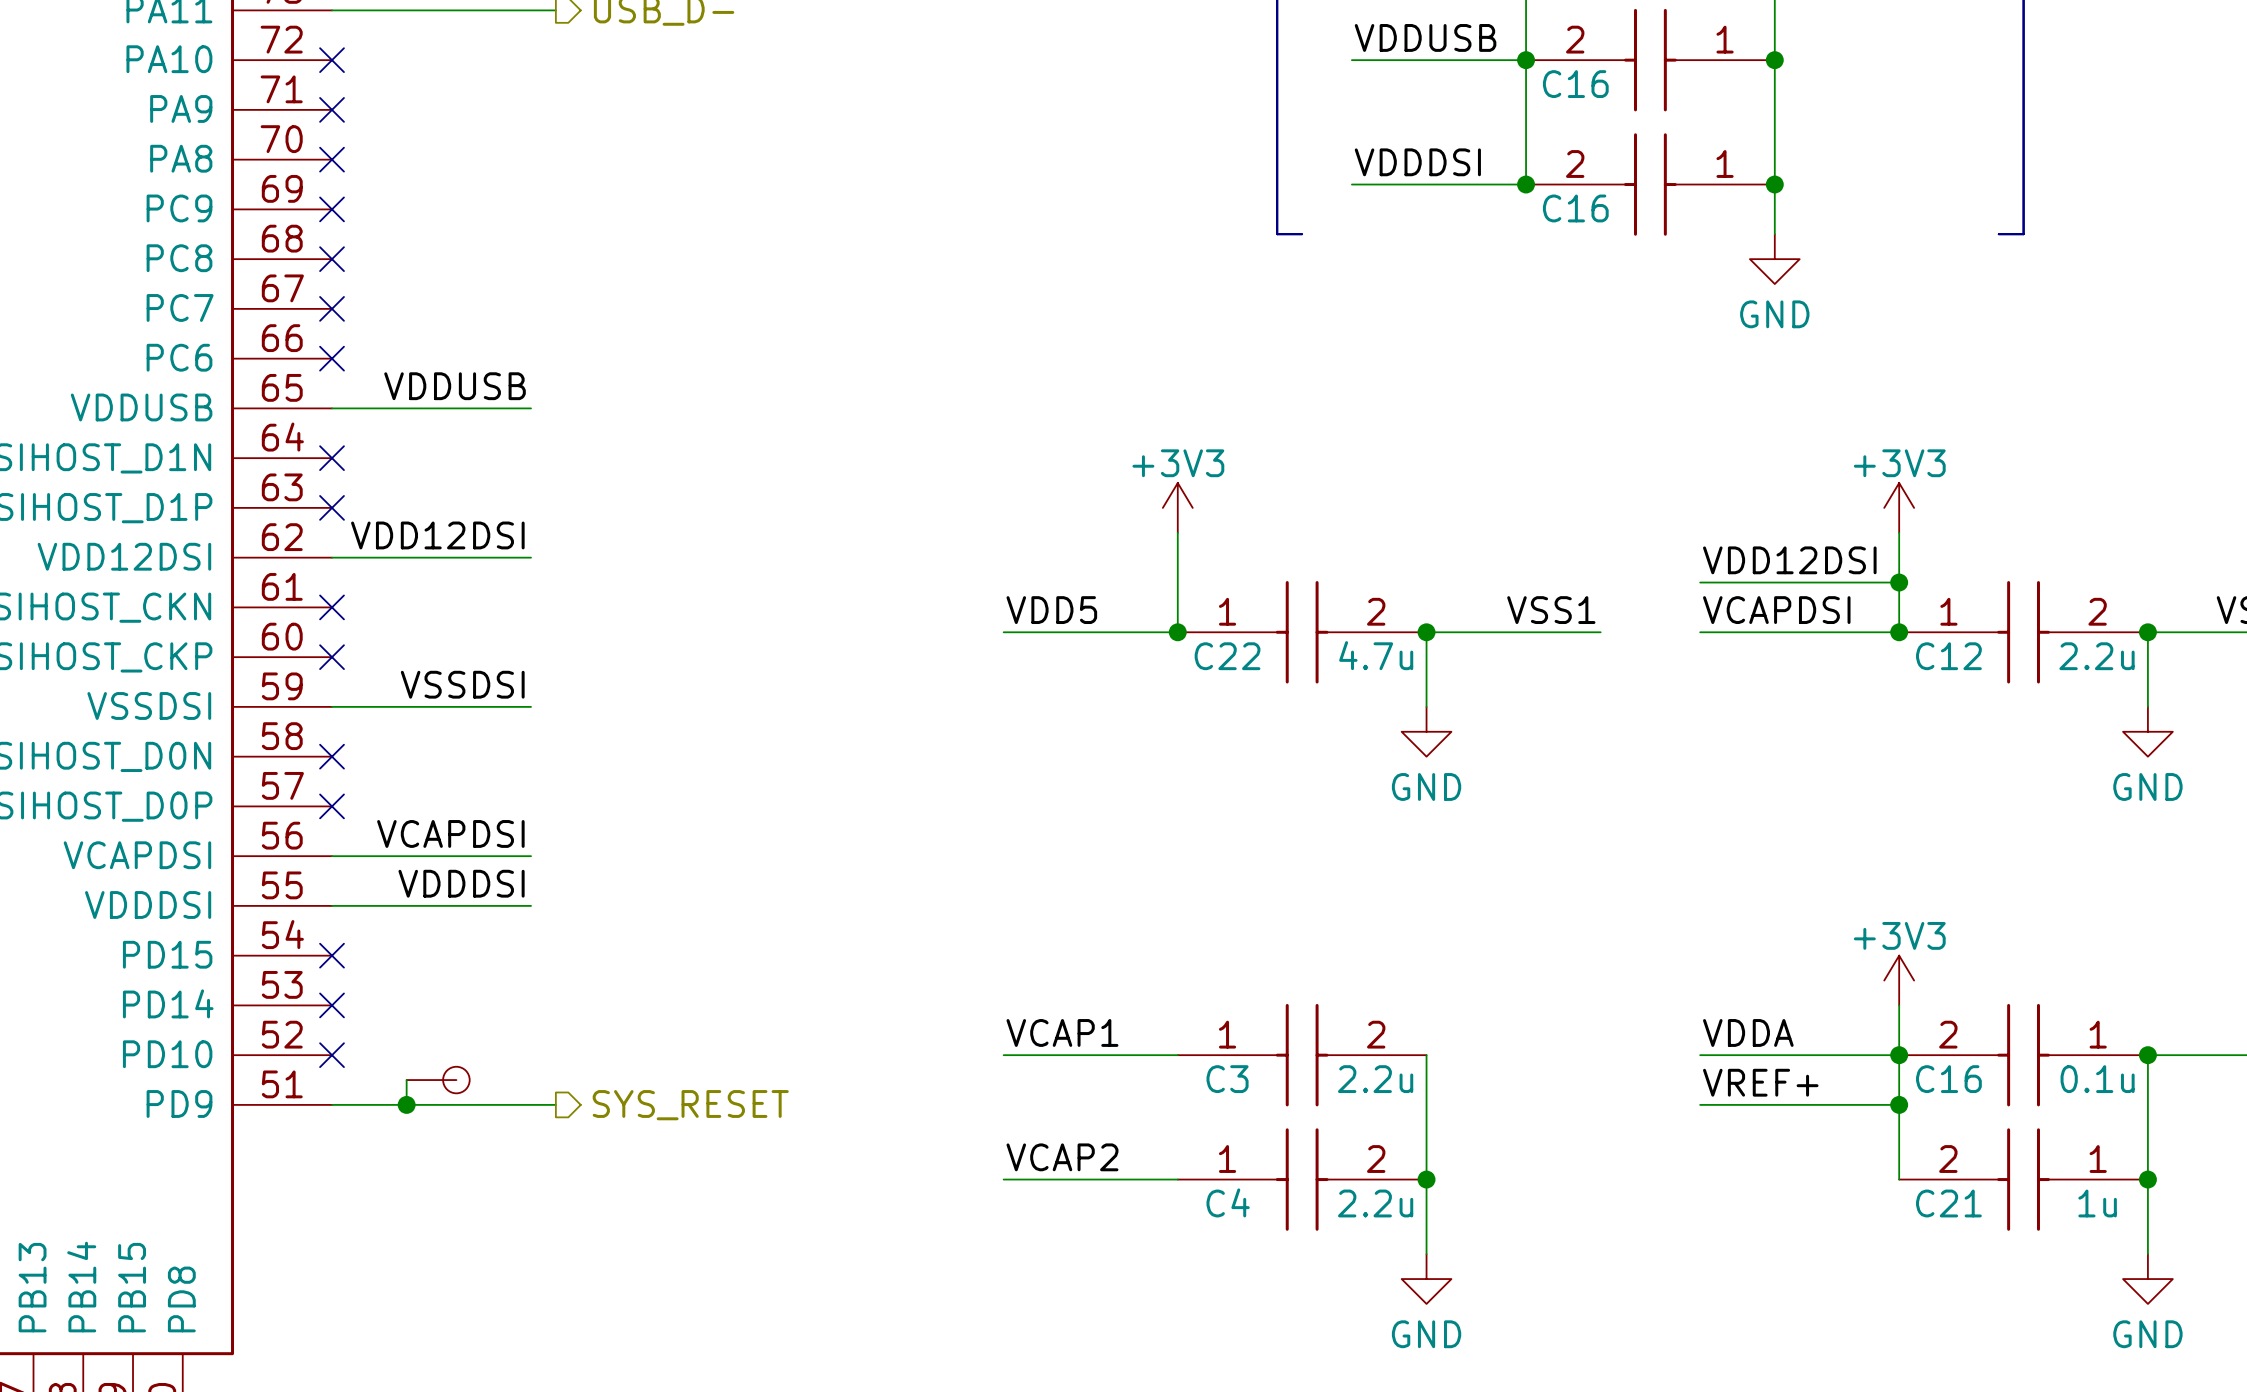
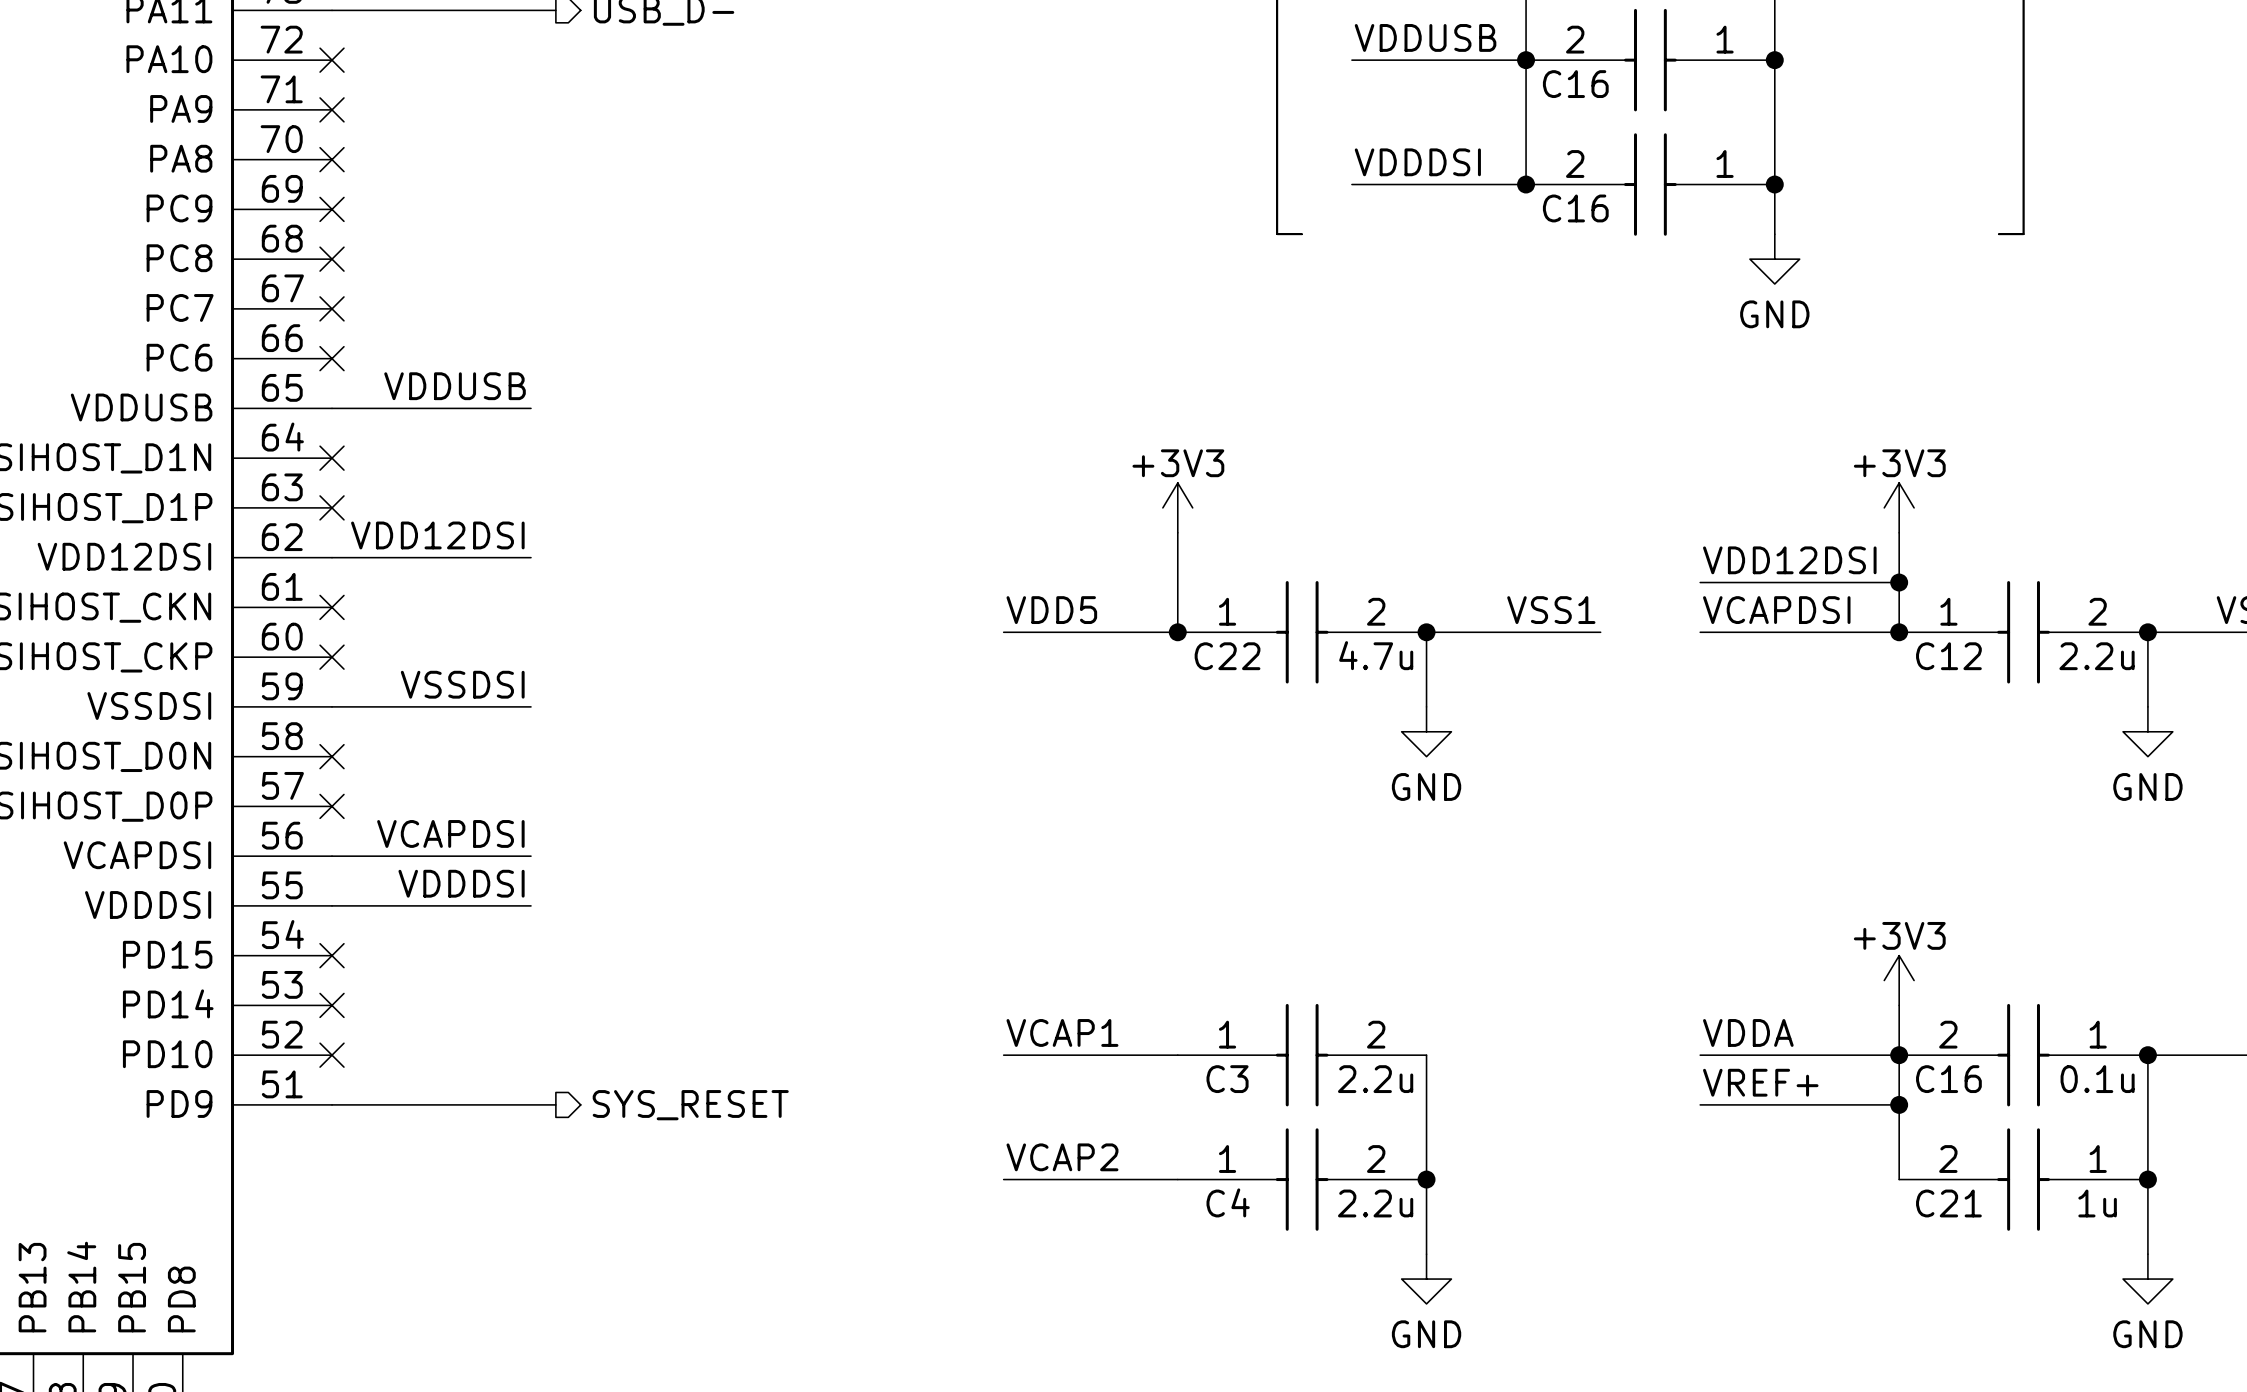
wire: (406, 1080) (406, 1104) -> none
part: (438, 1080) -> none
junction: (406, 1104) -> none

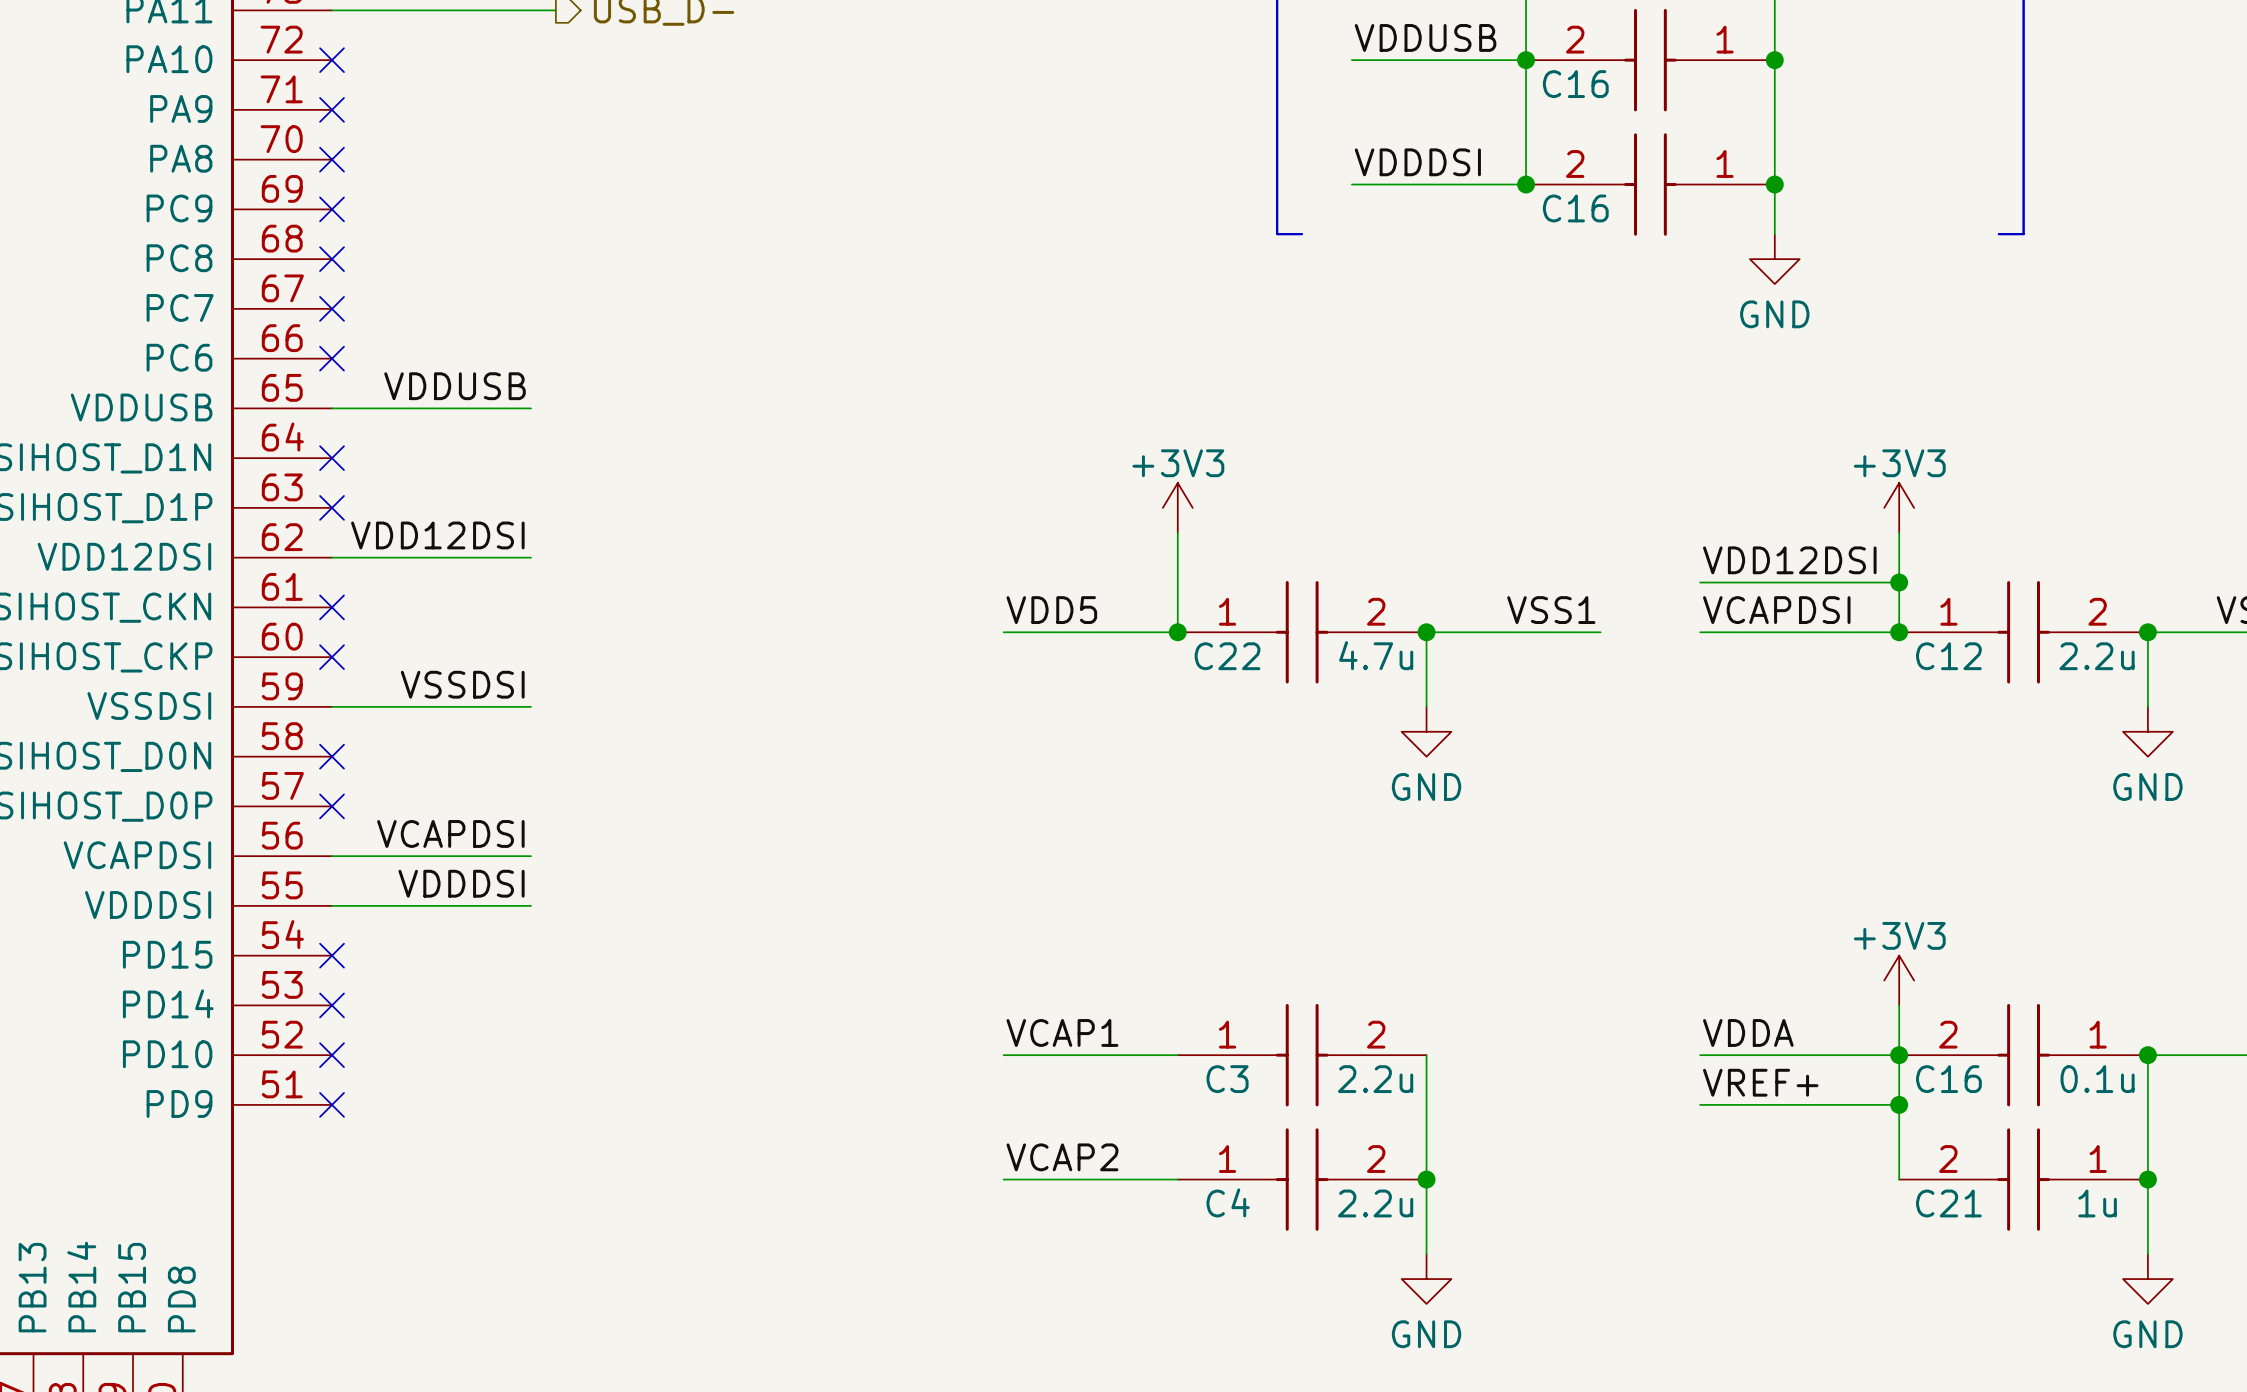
wire: (332, 1104) (555, 1104) -> none
no-connect mark: none -> (332, 1104)
hierarchical label: SYS_RESET (690, 1105) -> none

